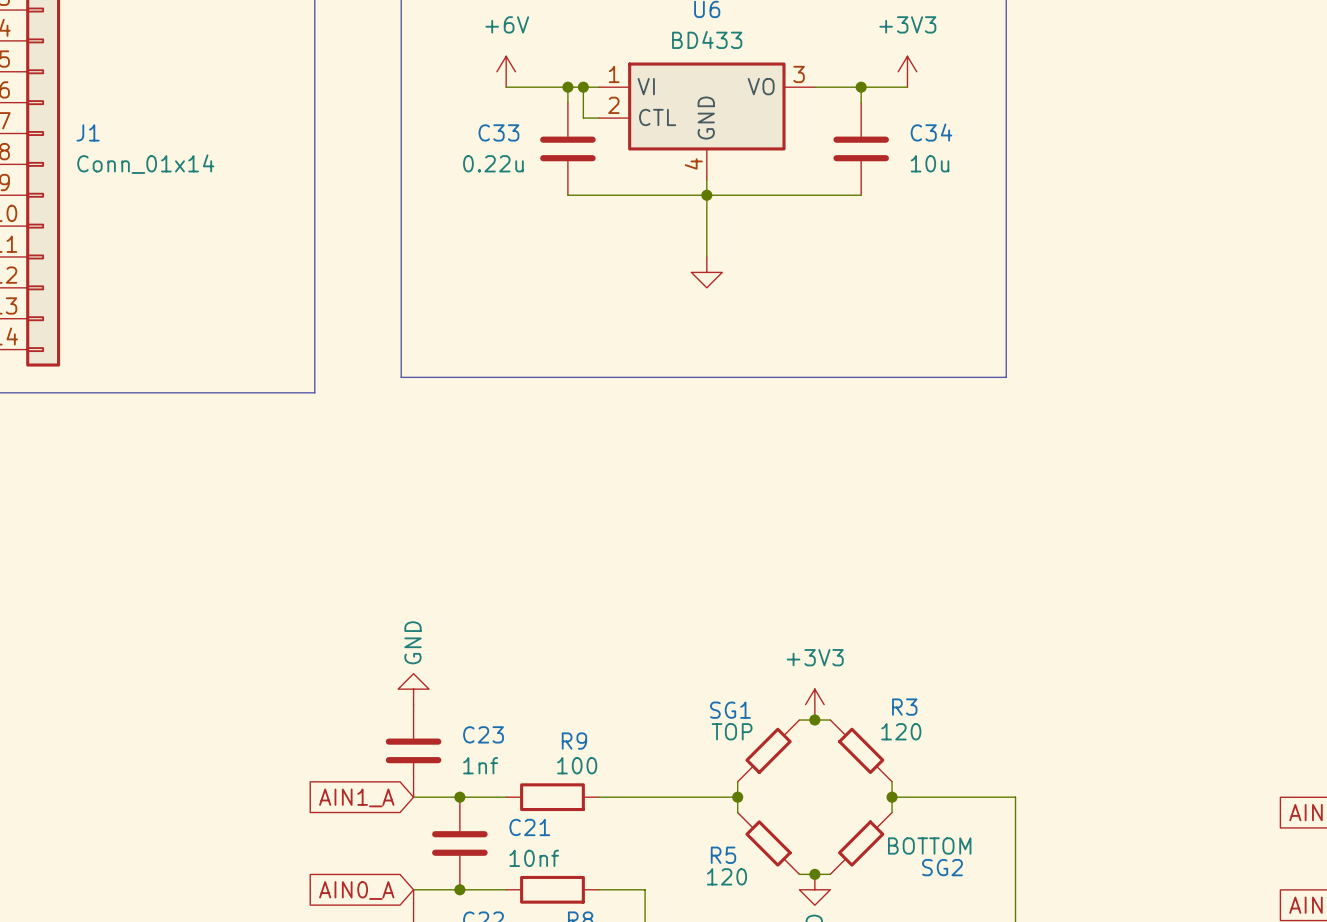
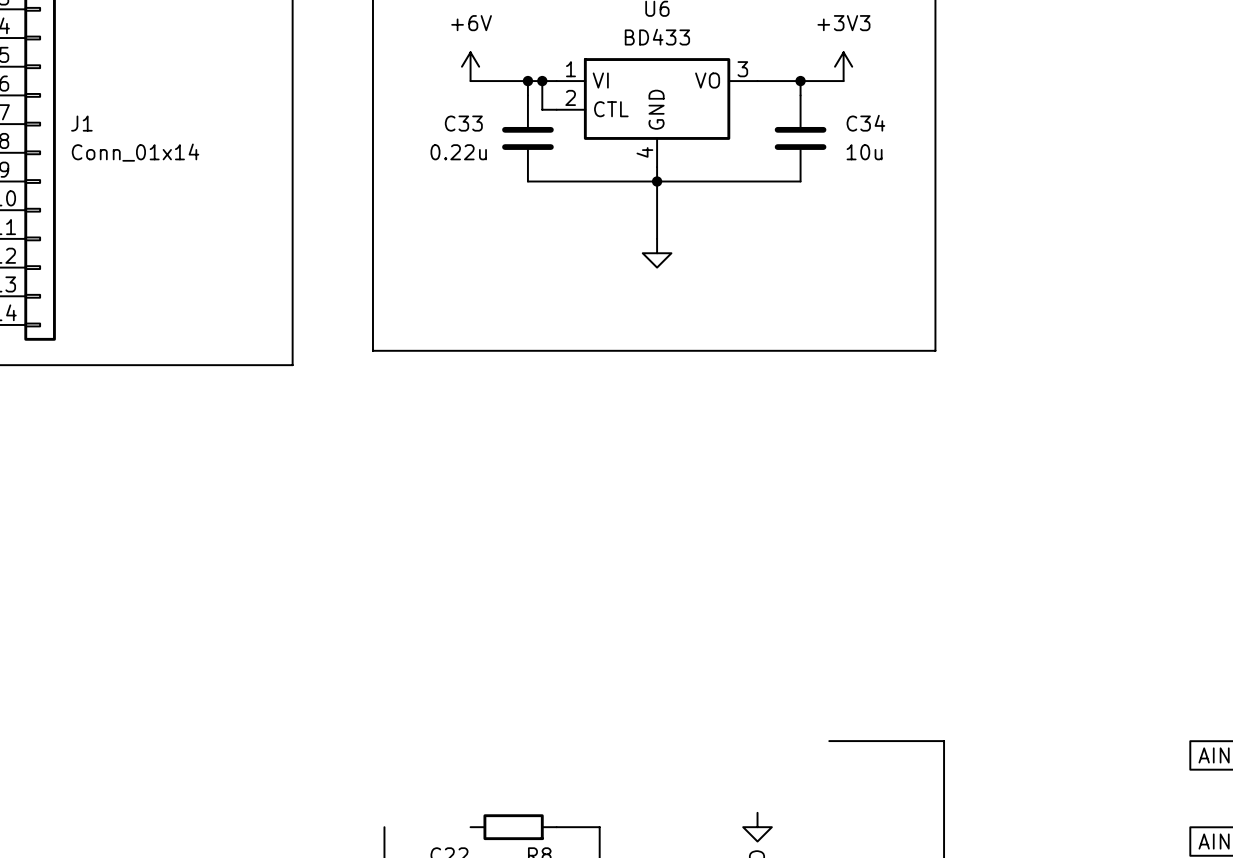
power symbol: GND (413, 689) -> none
power symbol: +3V3 (814, 704) -> none
wire: (799, 720) (830, 720) -> none
junction: (814, 720) -> none
C23: 1nf (413, 750) -> none
SG1: TOP (768, 750) -> none
R3: 120 (861, 750) -> none
wire: (737, 781) (737, 812) -> none
wire: (892, 781) (892, 812) -> none
global label: AIN1_A (356, 797) -> none
wire: (413, 797) (506, 797) -> none
junction: (459, 797) -> none
R9: 100 (552, 797) -> none
wire: (598, 797) (737, 797) -> none
junction: (737, 797) -> none
junction: (892, 797) -> none
C21: 10nf (459, 843) -> none
R5: 120 (768, 843) -> none
SG2: BOTTOM (861, 843) -> none
wire: (799, 874) (830, 874) -> none
junction: (814, 874) -> none
wire: (413, 889) (506, 889) -> none
junction: (459, 889) -> none
global label: AIN0_A (356, 890) -> none

